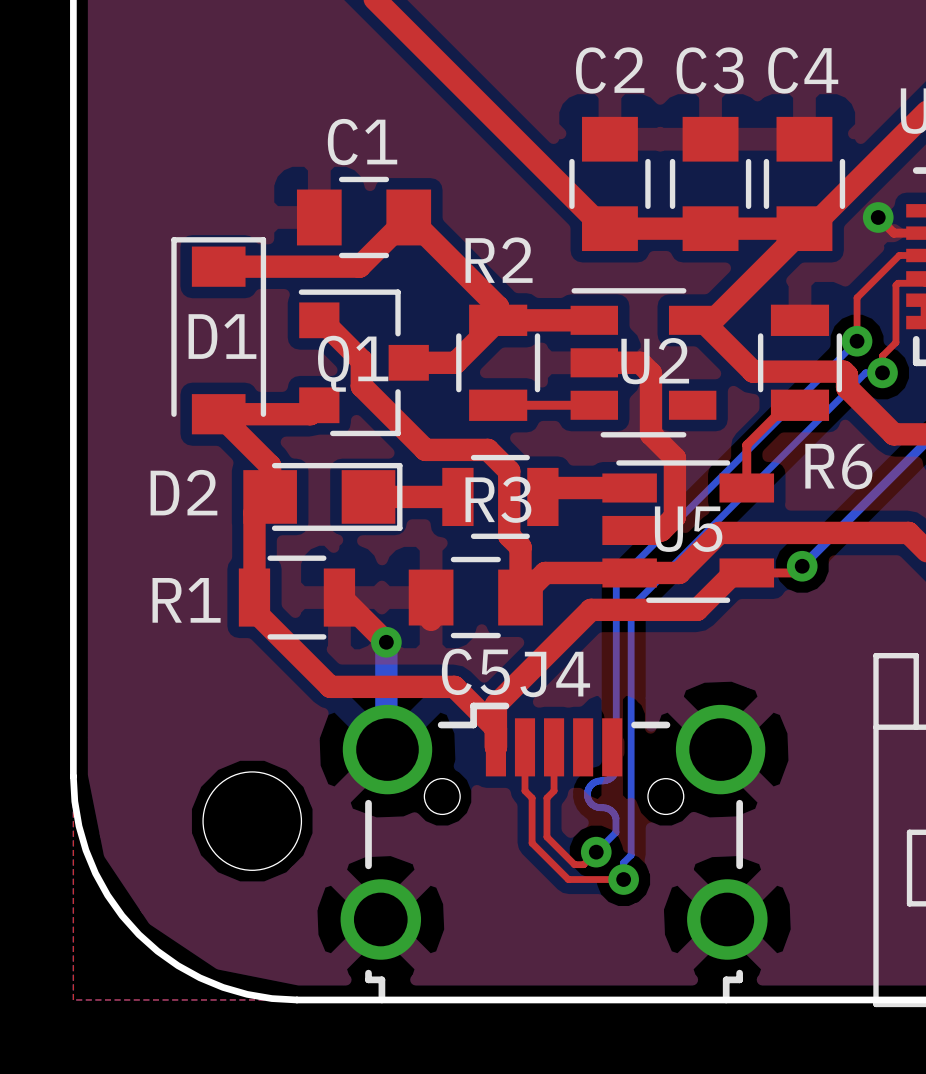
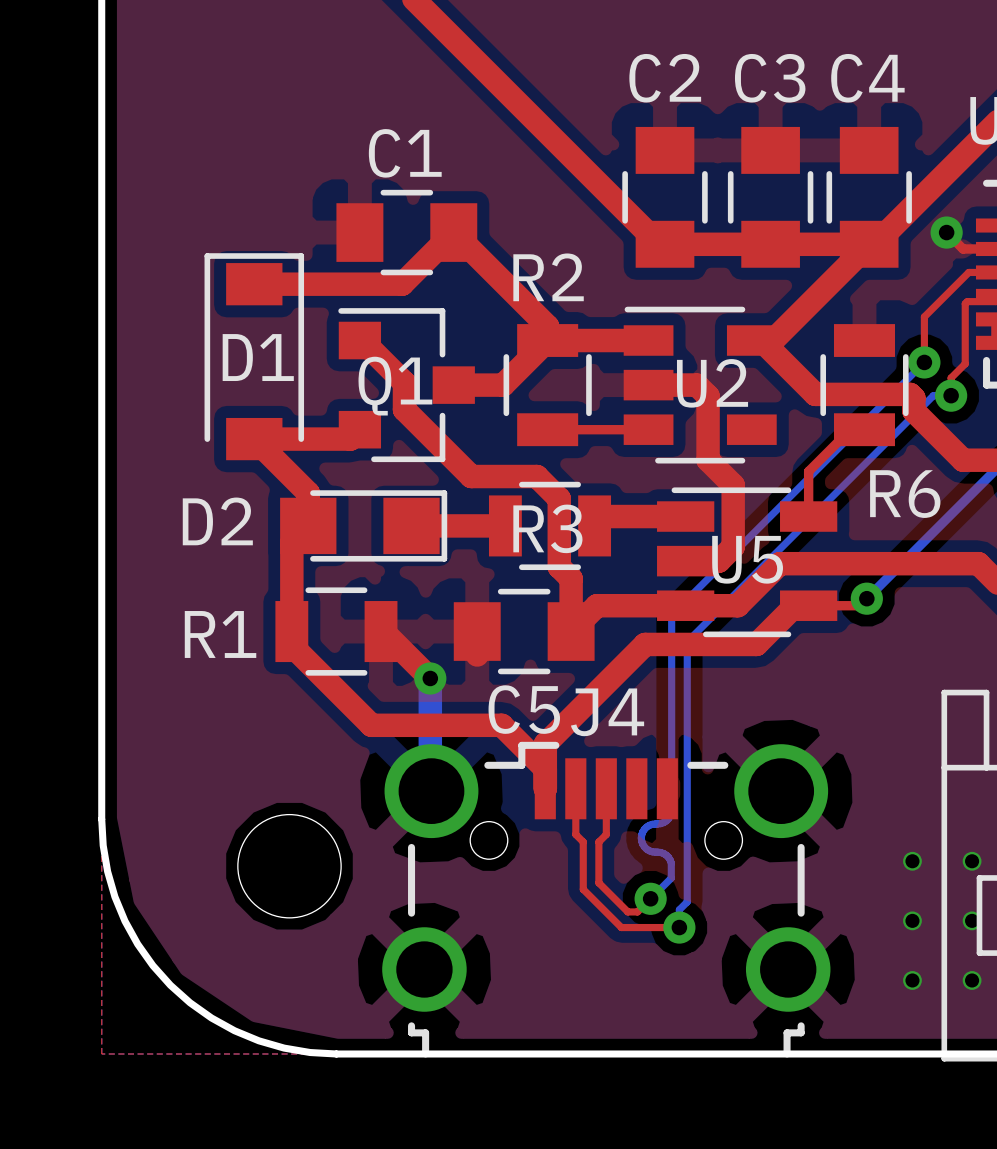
part: none -> (912, 861)
part: none -> (972, 861)
part: none -> (912, 920)
part: none -> (972, 920)
part: none -> (912, 980)
part: none -> (972, 980)

